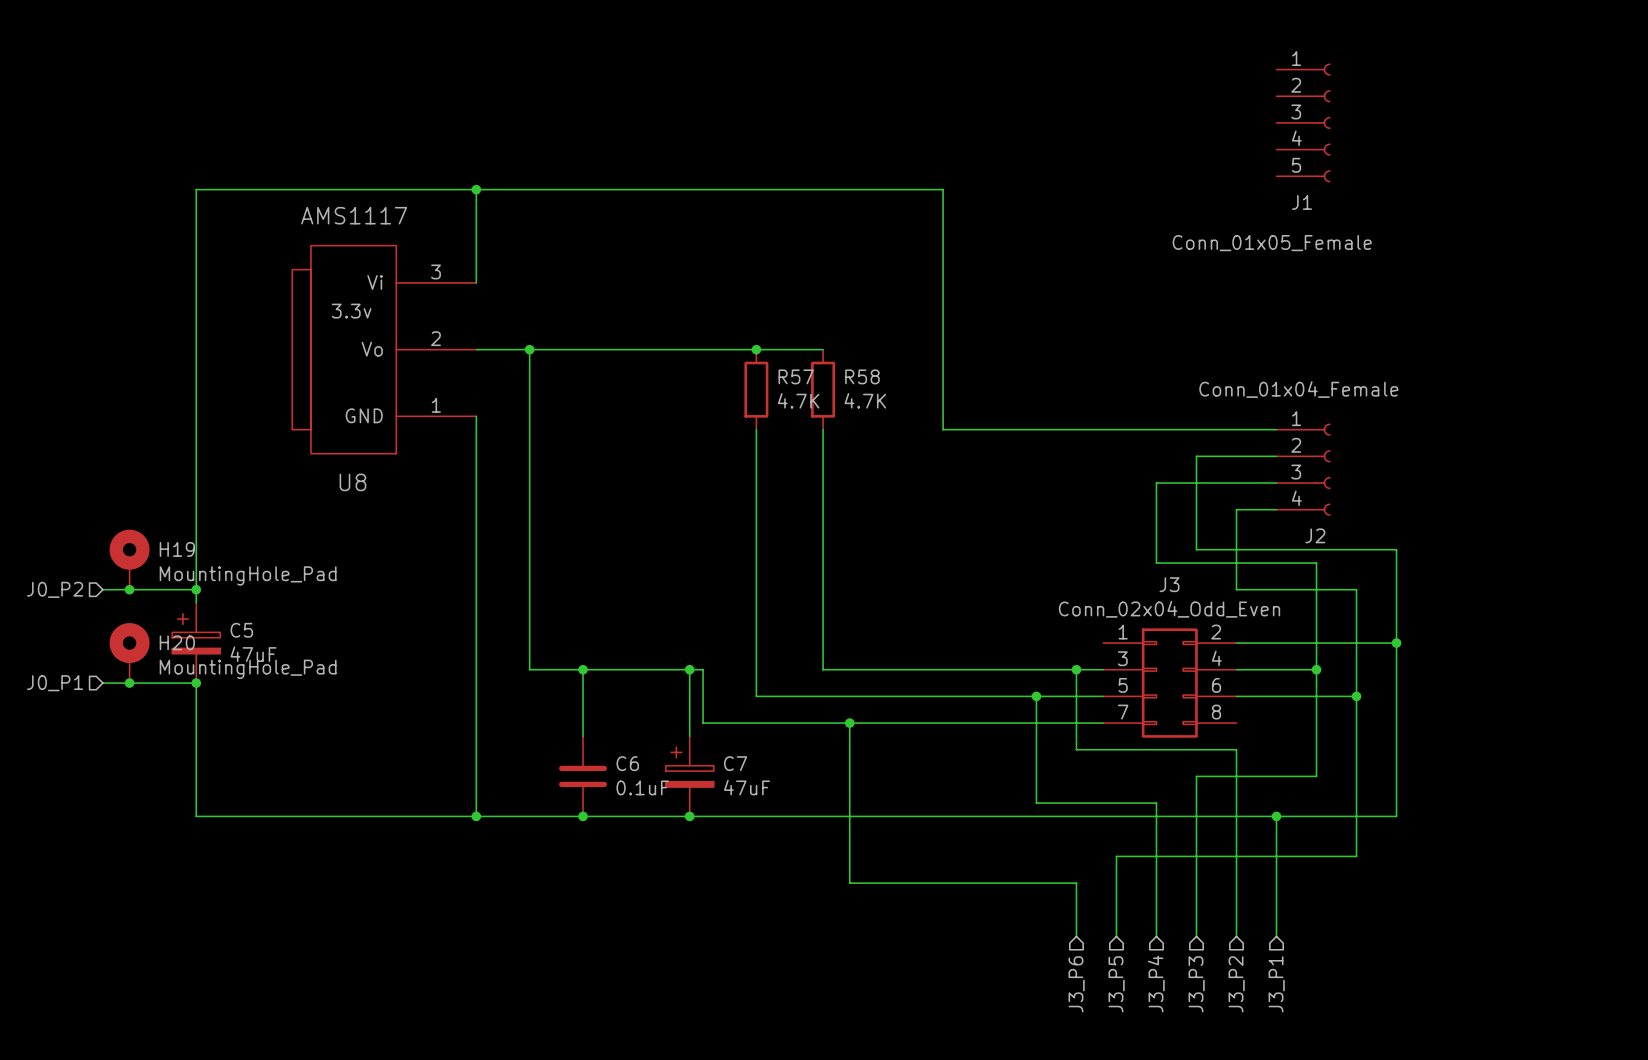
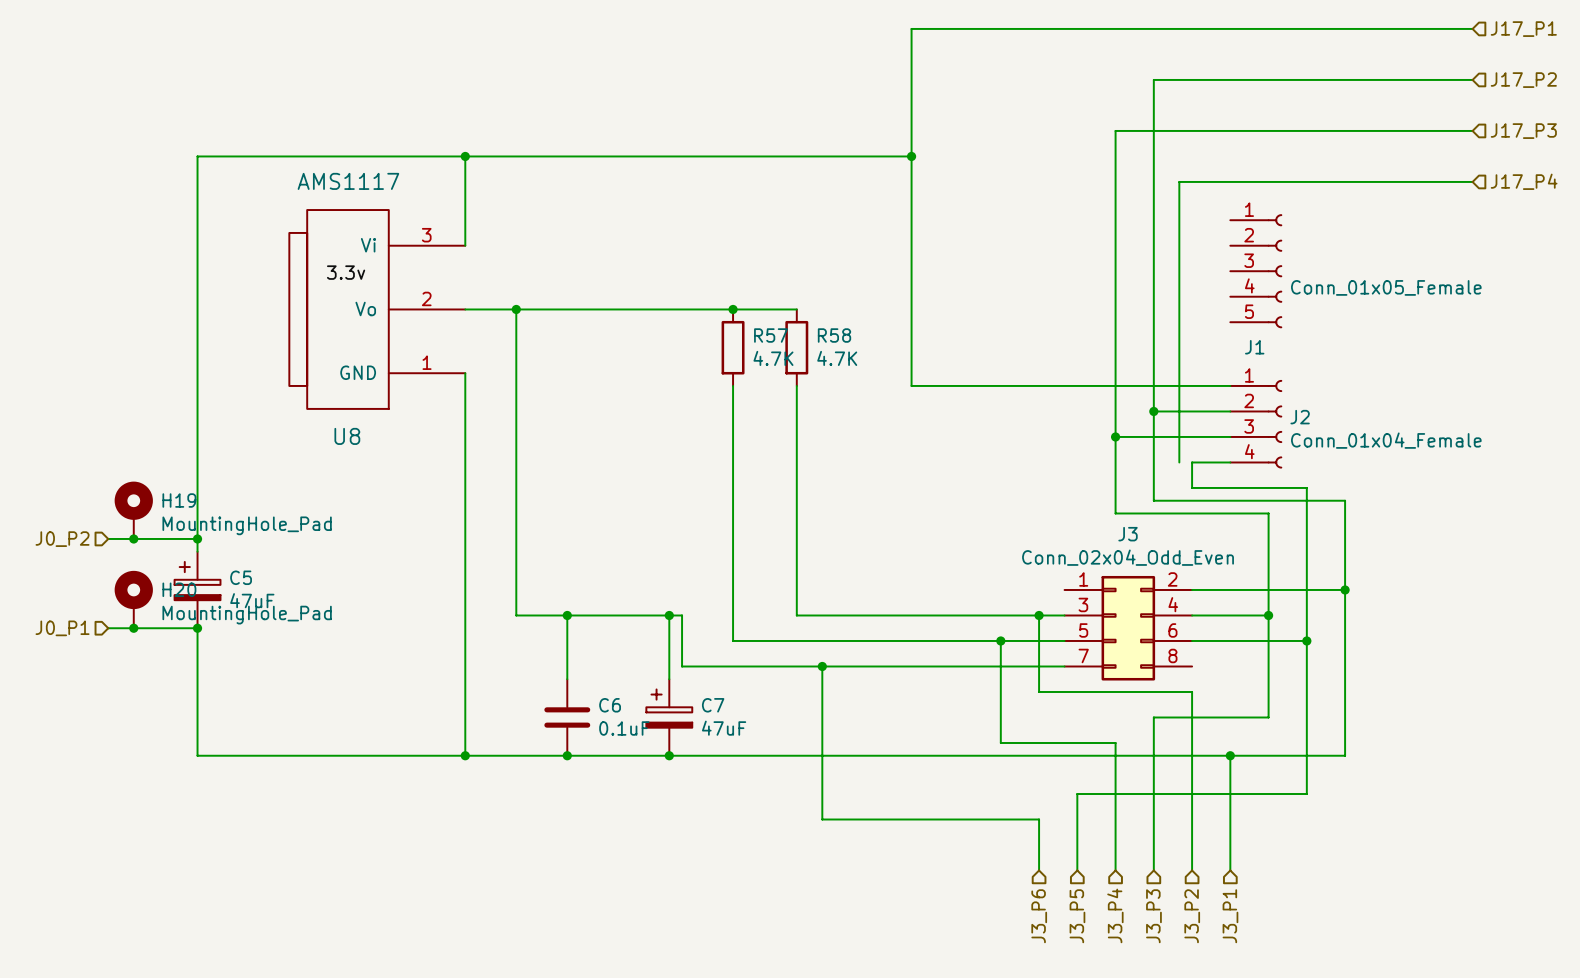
wire: none -> (1472, 28) (911, 28) (911, 156)
hierarchical label: none -> J17_P1 (1523, 29)
wire: none -> (1472, 79) (1153, 79) (1153, 411)
hierarchical label: none -> J17_P2 (1523, 80)
J1 position: (1303, 122) -> (1256, 271)
wire: none -> (1472, 130) (1115, 130) (1115, 436)
hierarchical label: none -> J17_P3 (1523, 131)
junction: none -> (911, 156)
wire: none -> (1472, 181) (1179, 181) (1179, 462)
hierarchical label: none -> J17_P4 (1524, 181)
J1 value position: Conn_01x05_Female (1272, 243) -> Conn_01x05_Female (1386, 287)
J2 value position: Conn_01x04_Female (1298, 389) -> Conn_01x04_Female (1386, 440)
junction: none -> (1153, 411)
junction: none -> (1115, 436)
J2 name position: J2 (1315, 535) -> J2 (1300, 417)
wire: (1236, 536) (1236, 589) (1356, 589) -> (1192, 487) (1306, 487) (1306, 538)

